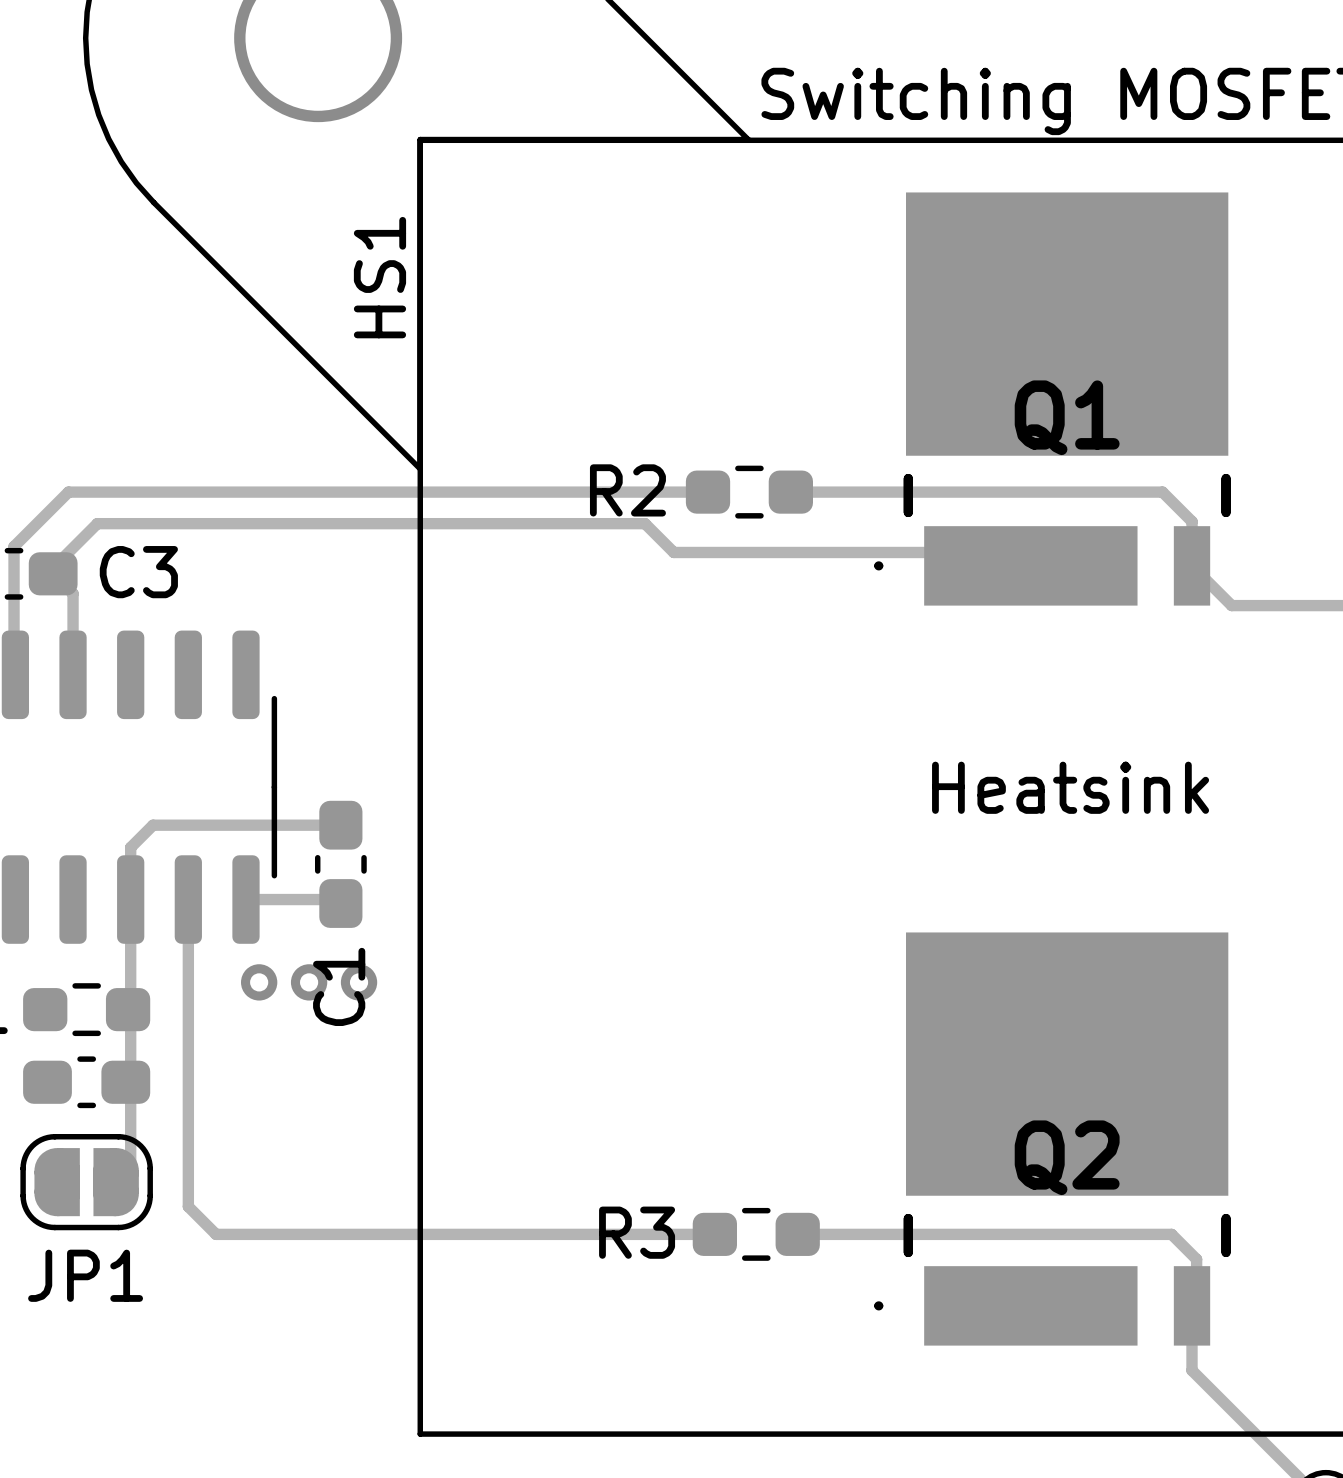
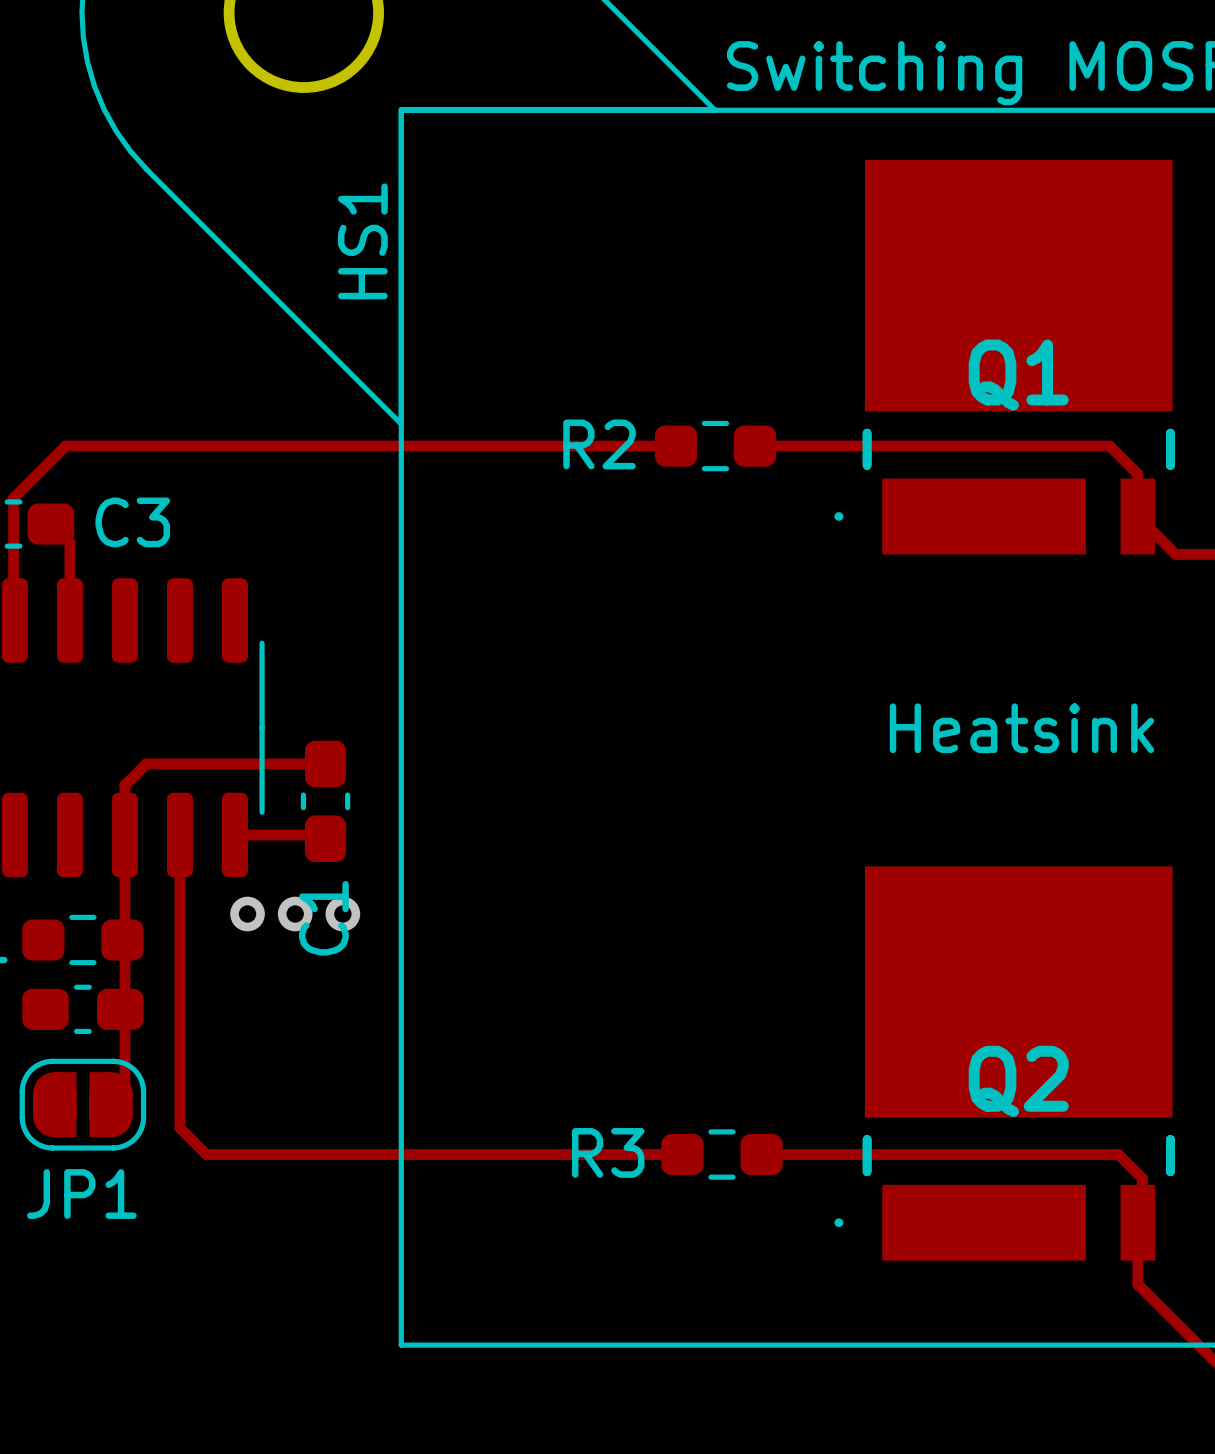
track: (1030, 565) (1017, 552) (673, 552) (645, 523) (97, 523) (53, 567) (53, 573) -> none

